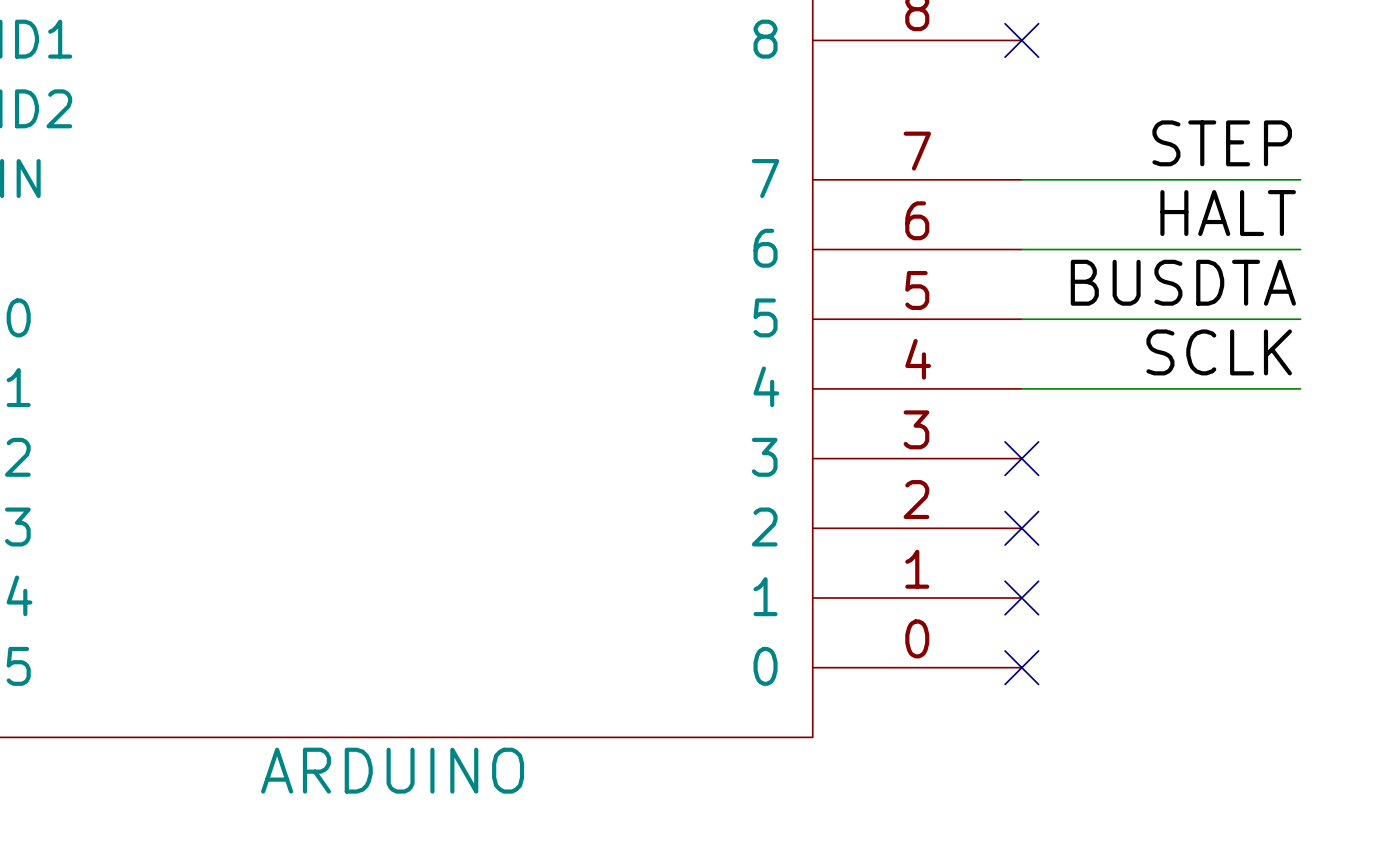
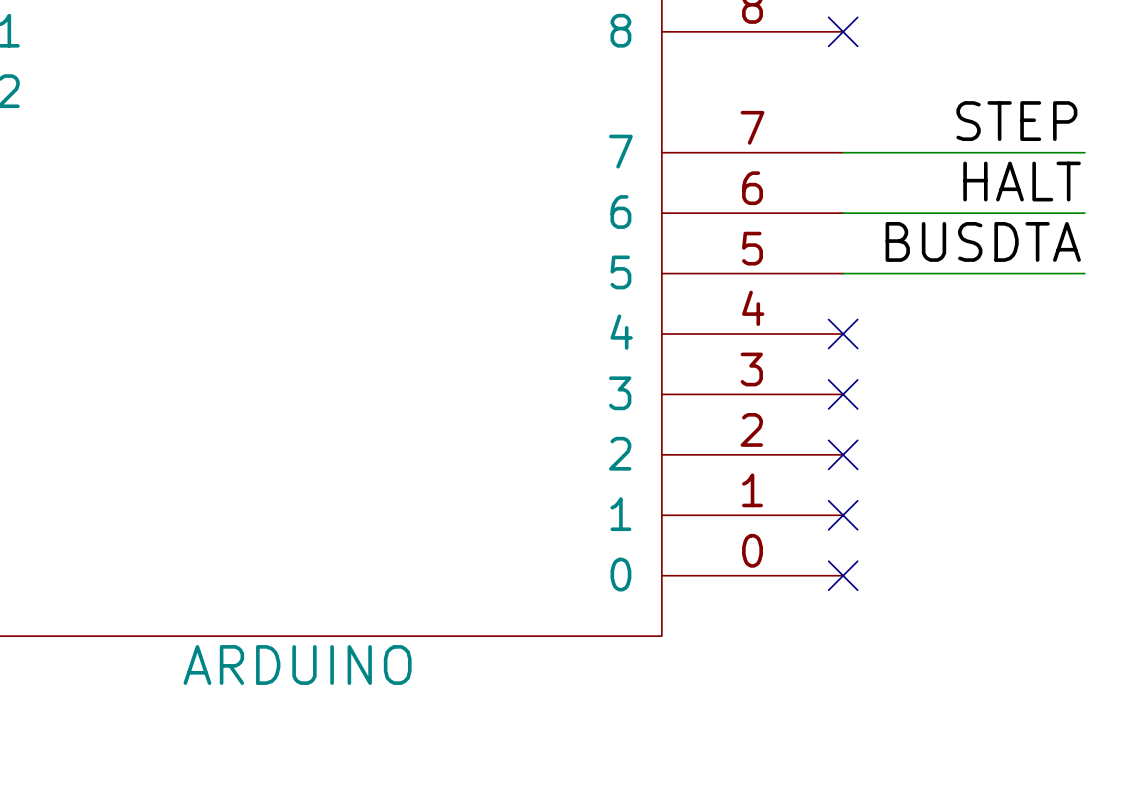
label: SCLK (1219, 352) -> none
wire: (1021, 388) (1300, 388) -> none
no-connect mark: none -> (843, 334)

